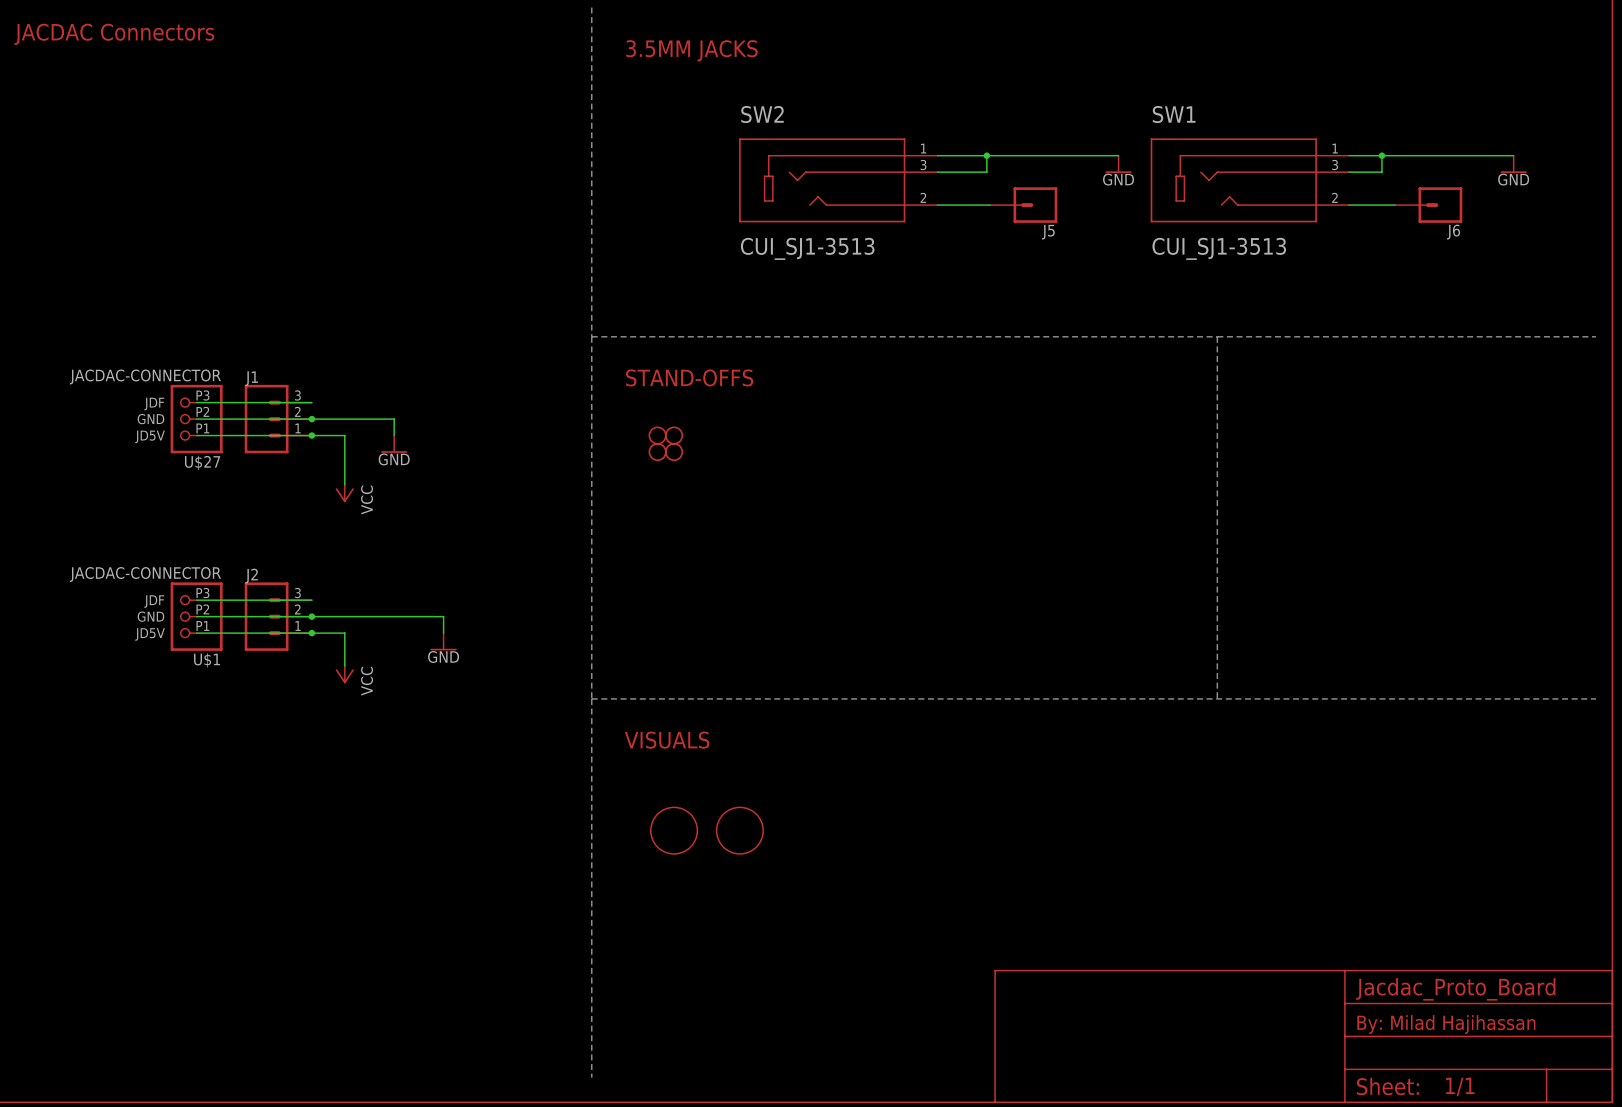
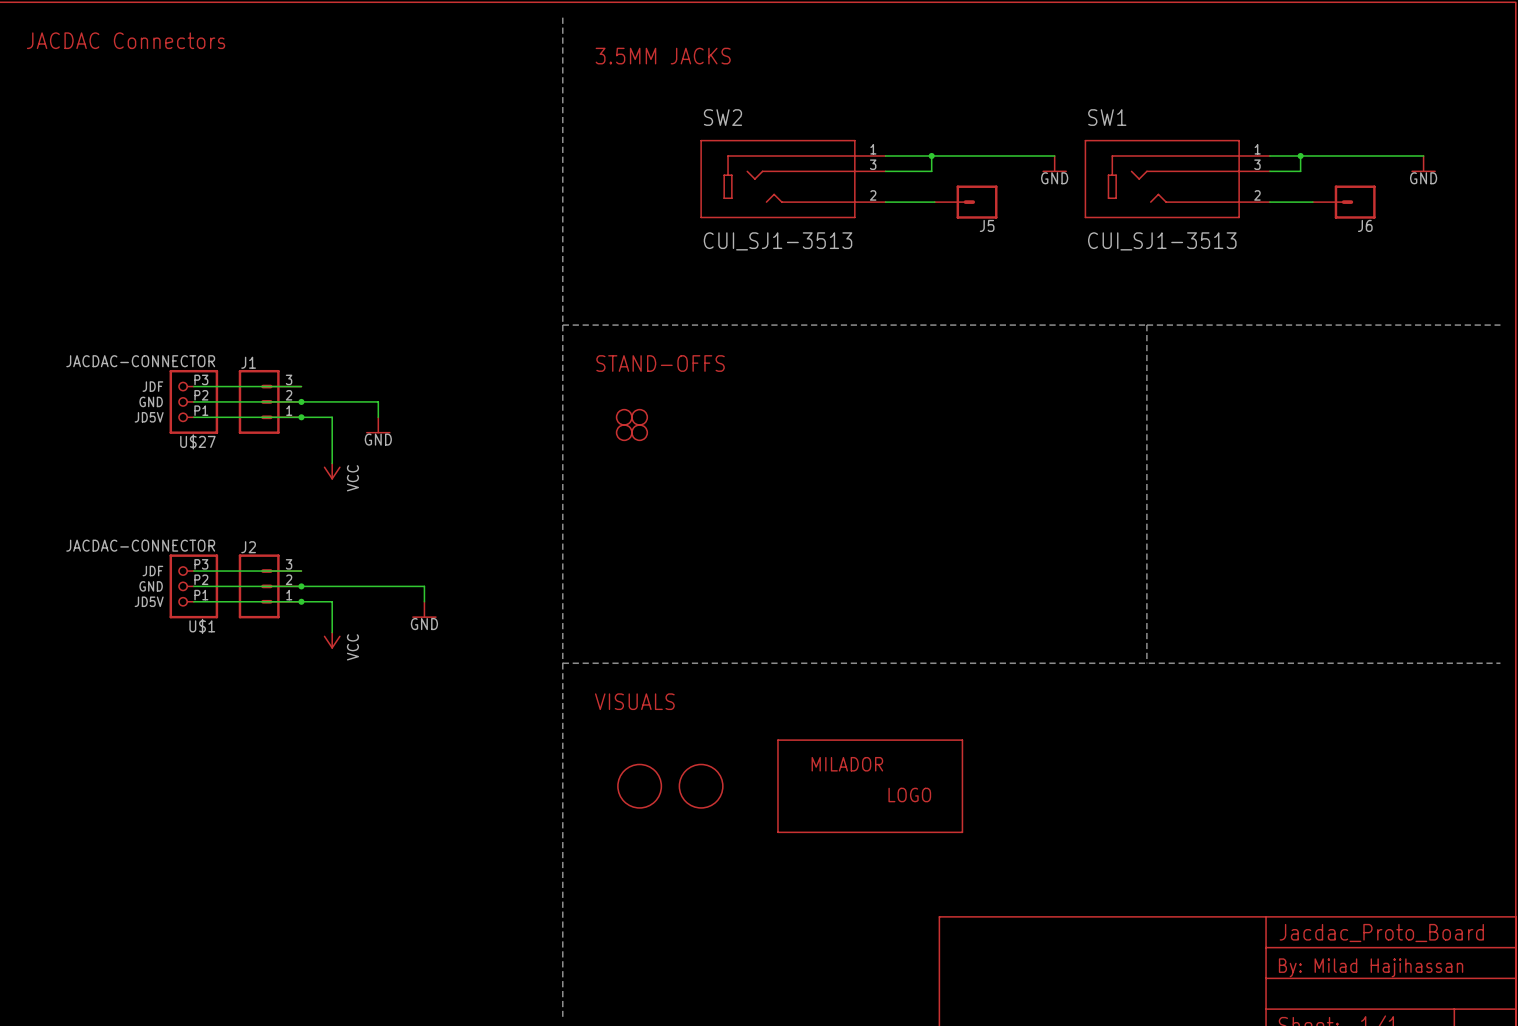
part: none -> (870, 786)

